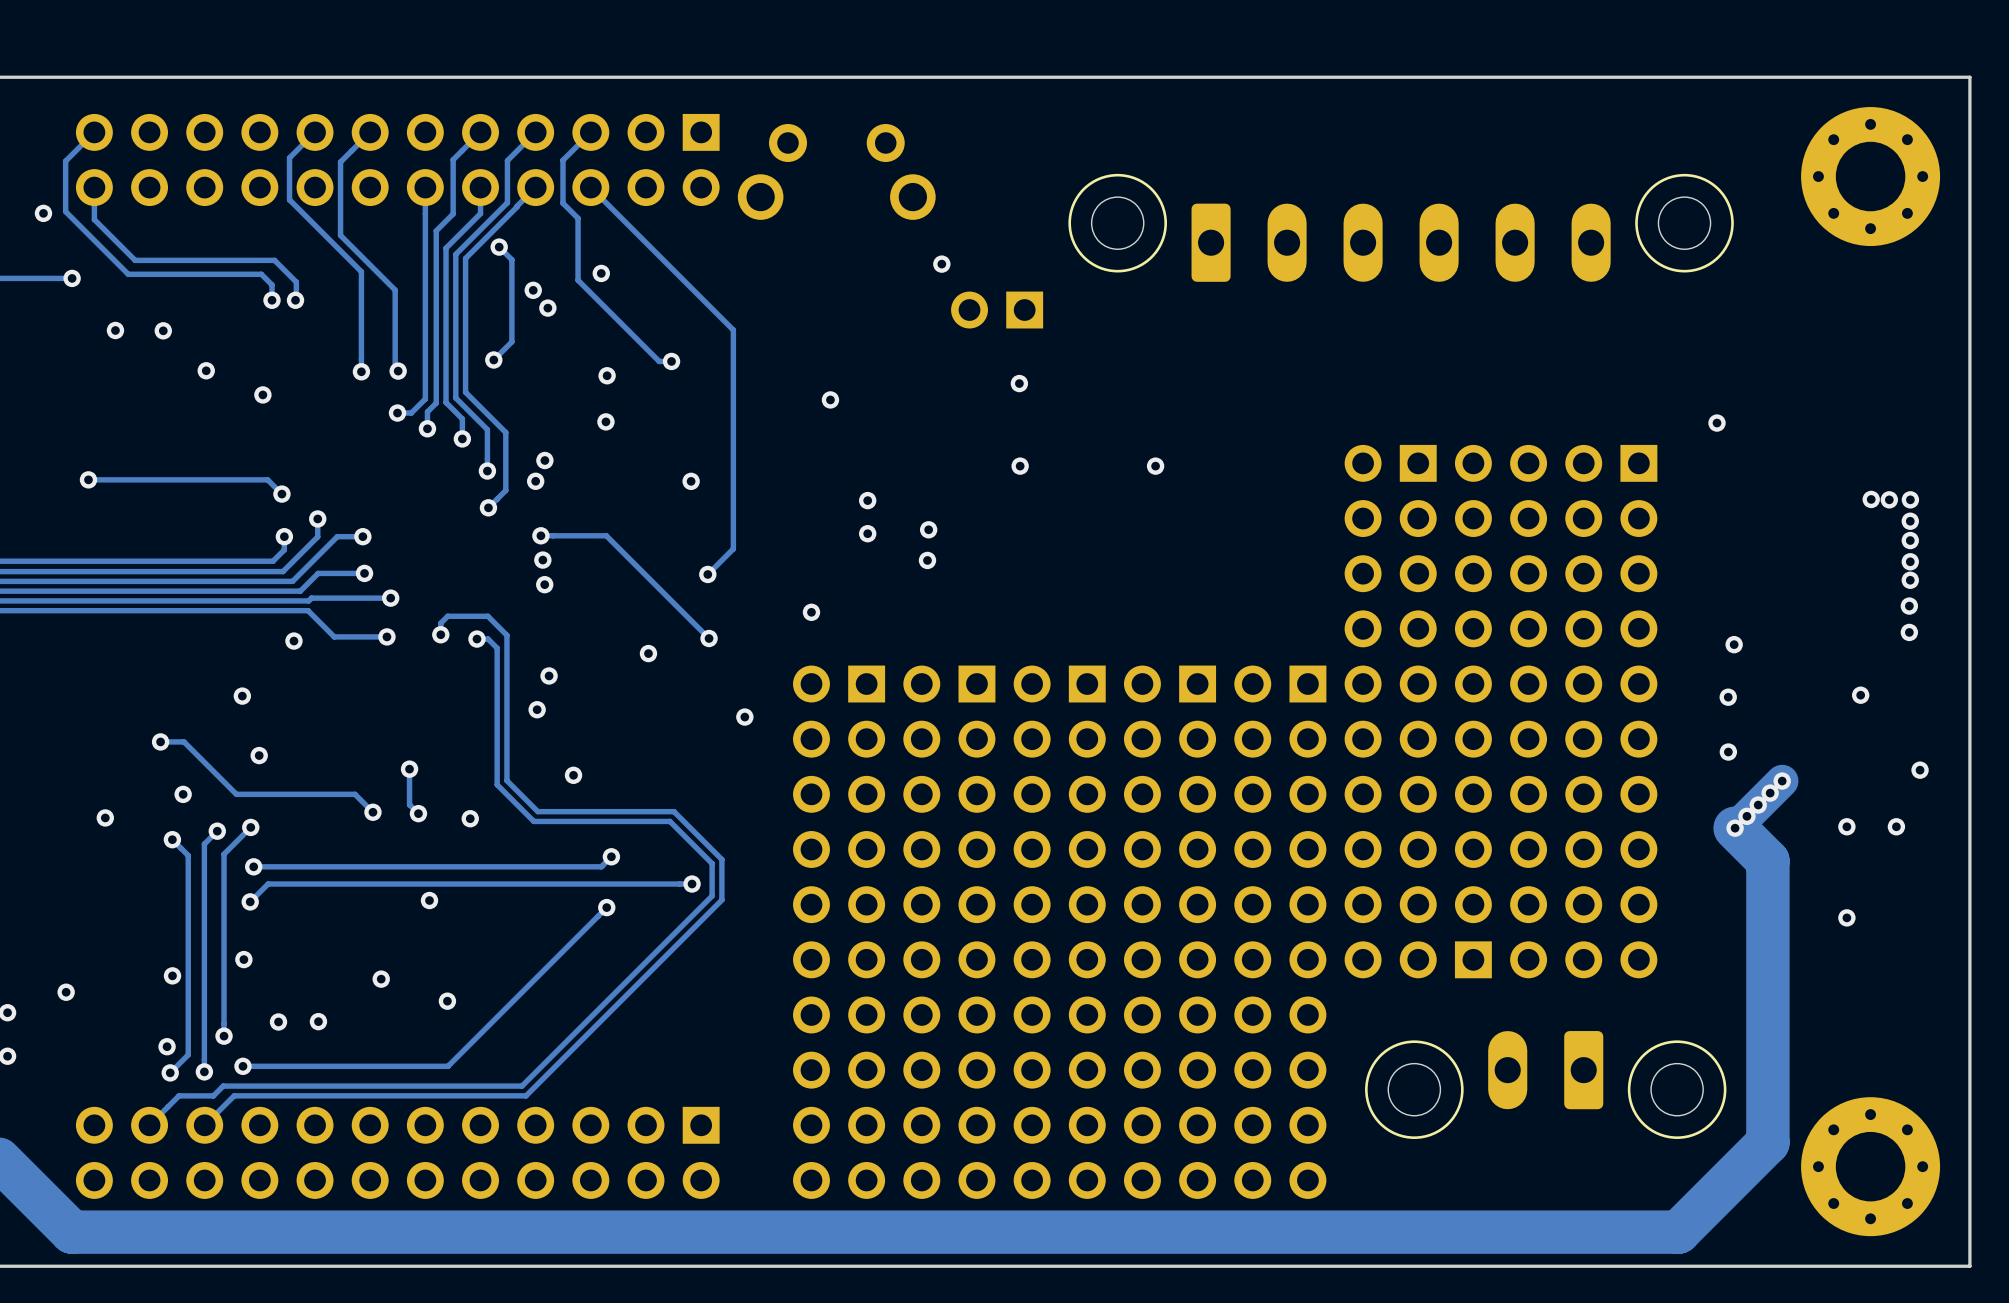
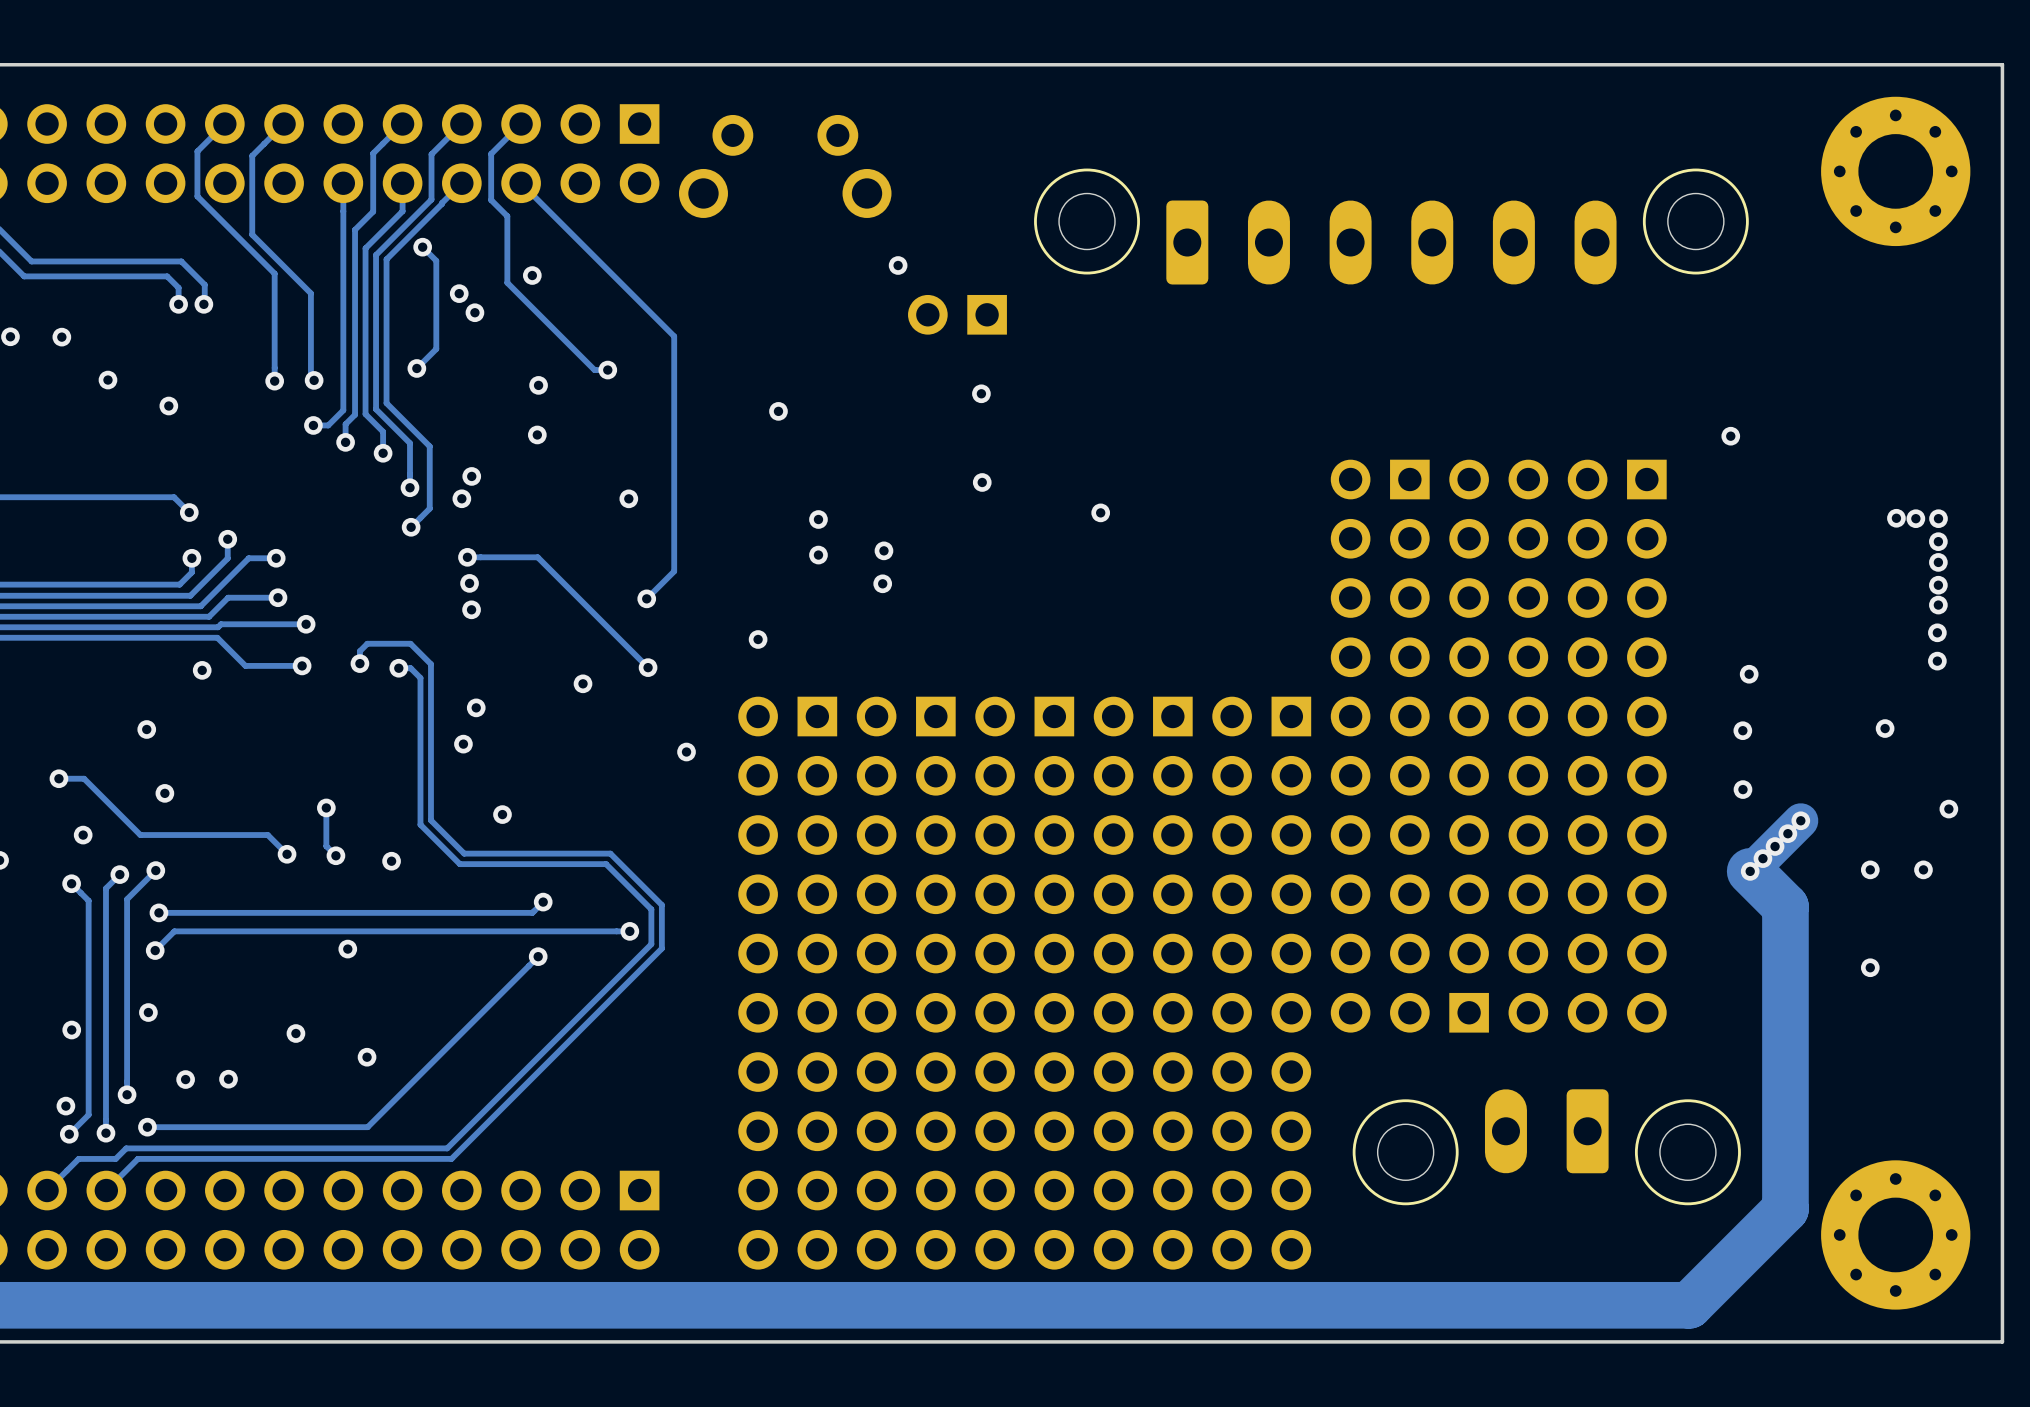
via position: (1155, 466) -> (1100, 512)

